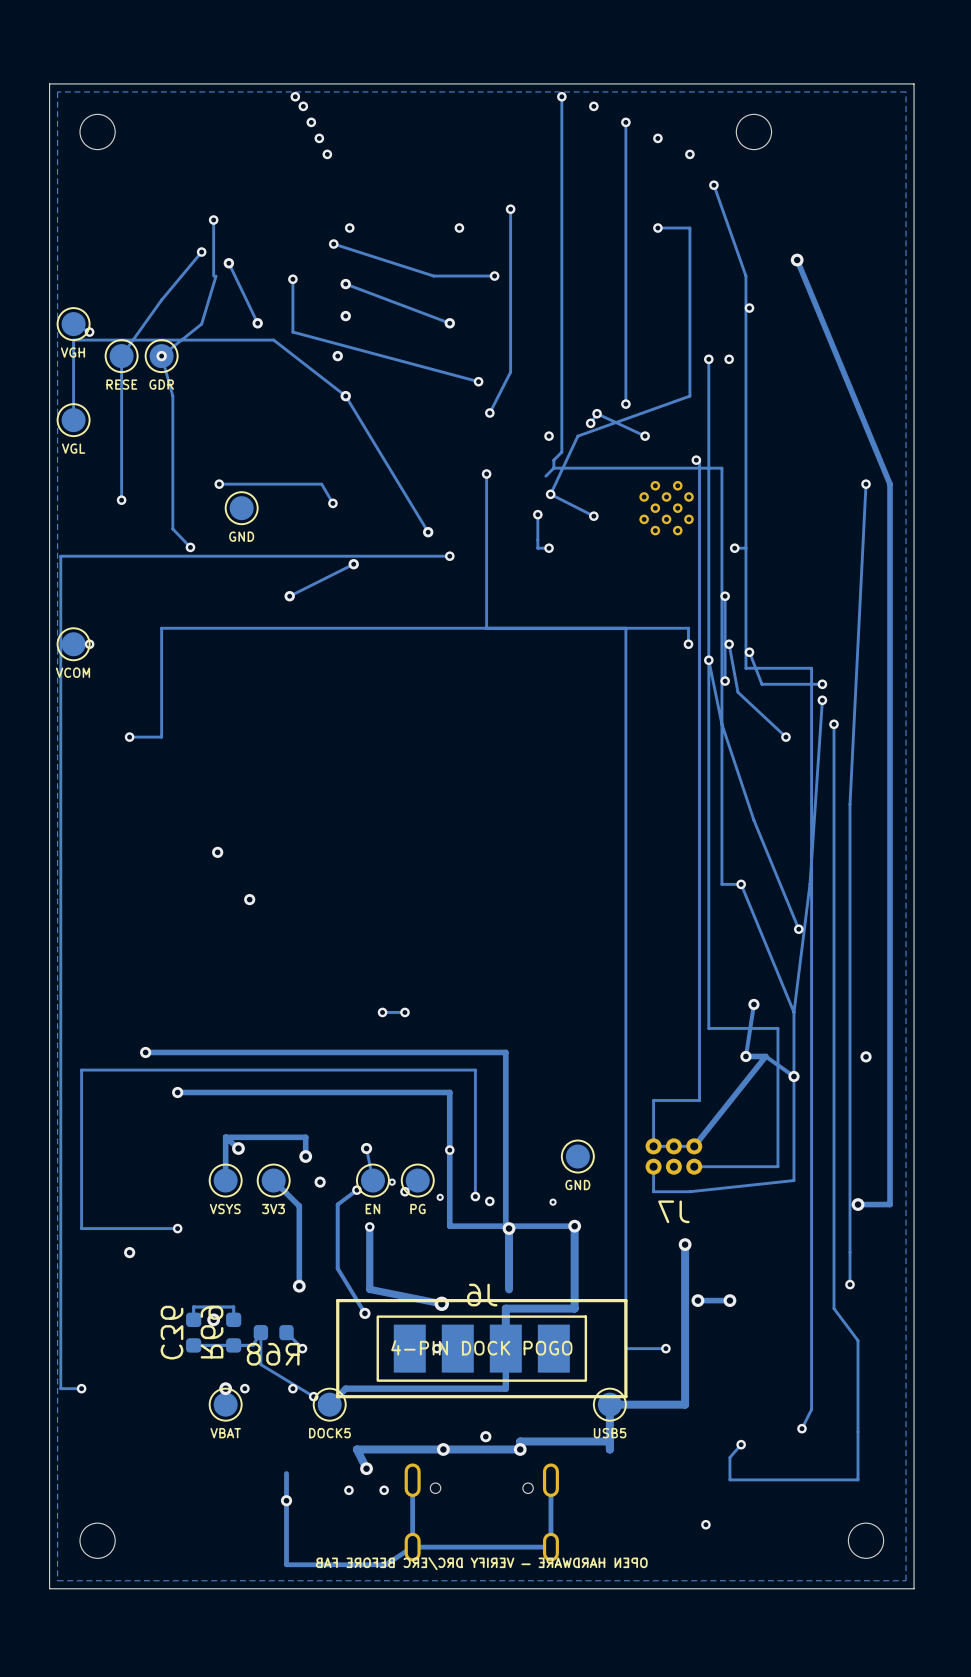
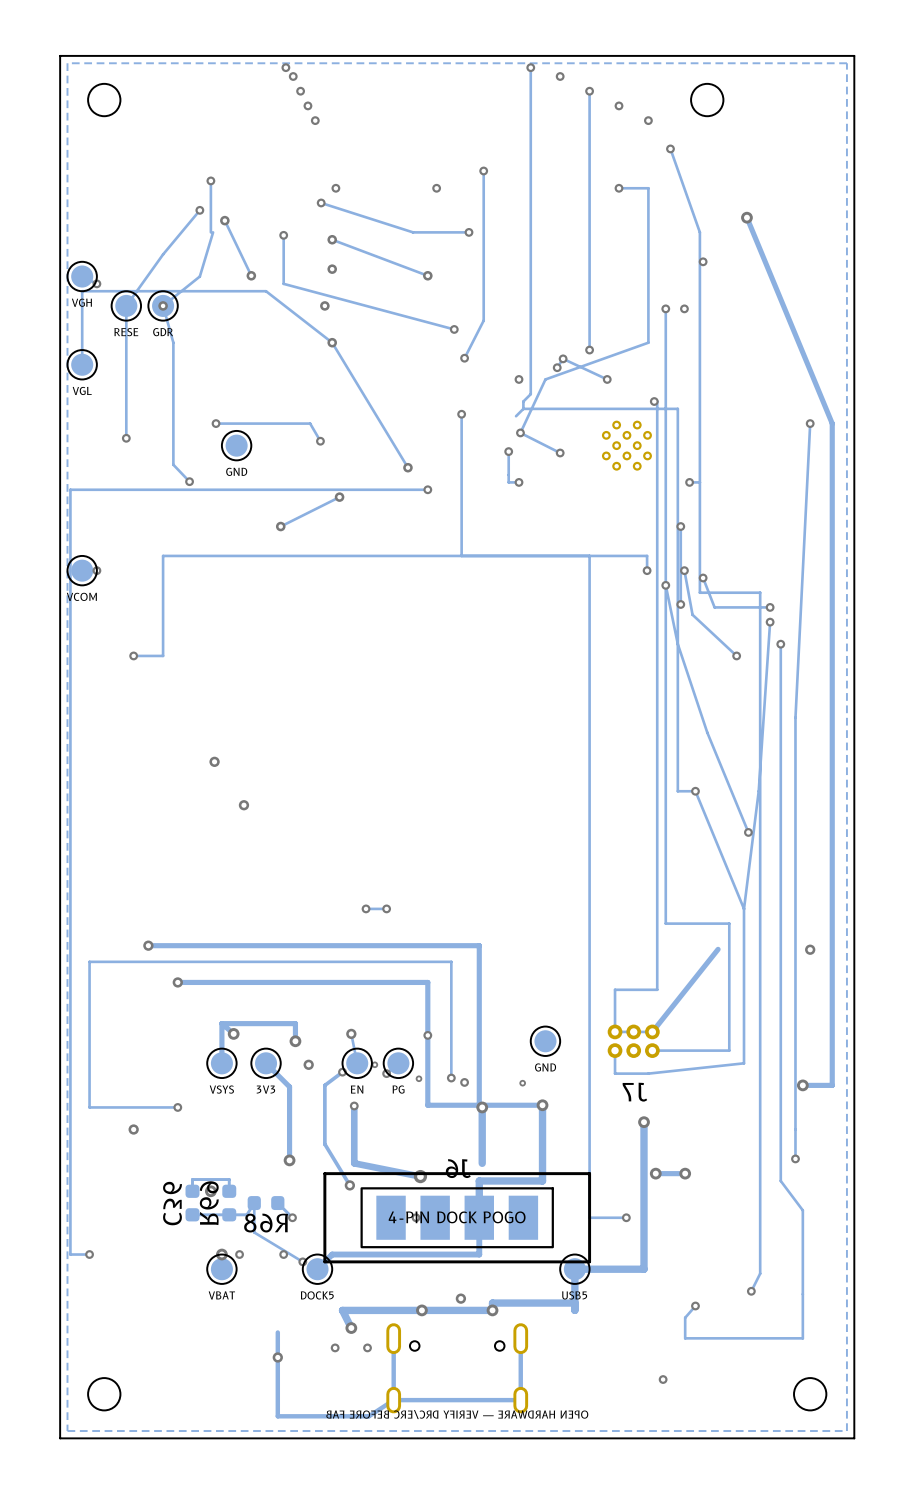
track: (753, 1004) (745, 1056) (765, 1056) (793, 1076) -> none
via: (753, 1004) -> none
via: (745, 1056) -> none
via: (793, 1076) -> none

